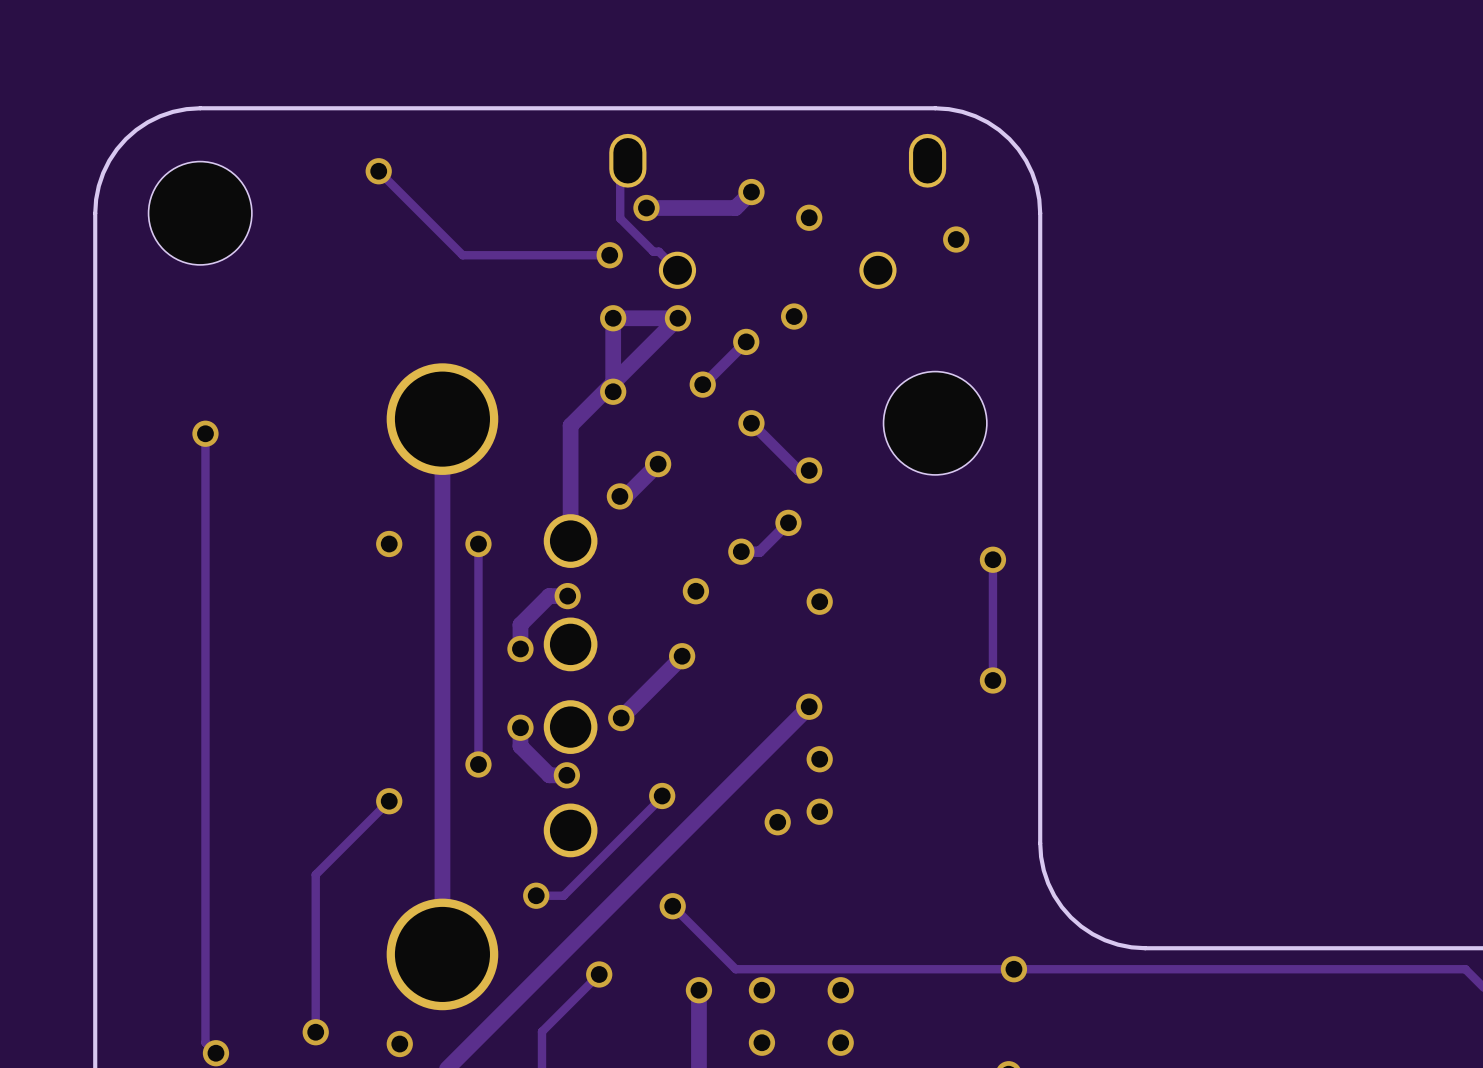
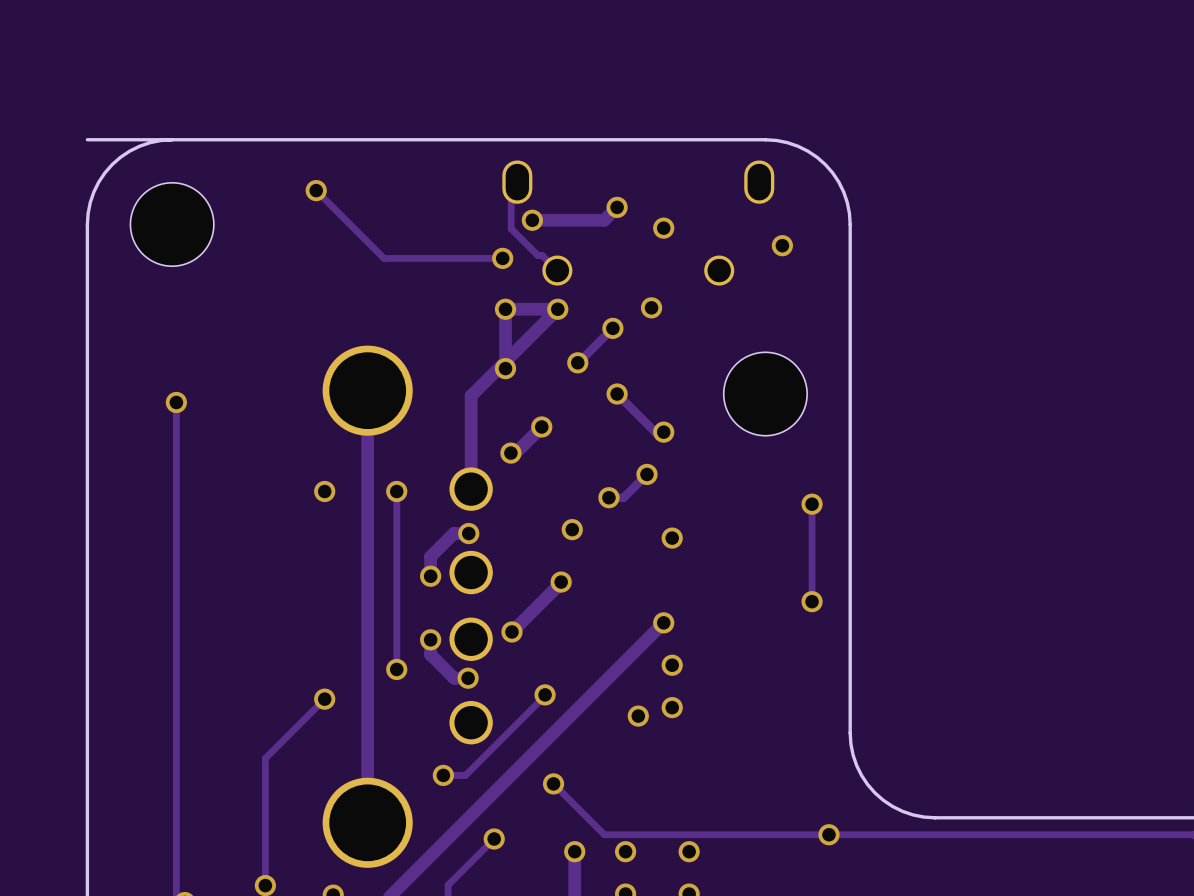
board edge: none -> (172, 139) (87, 139)

